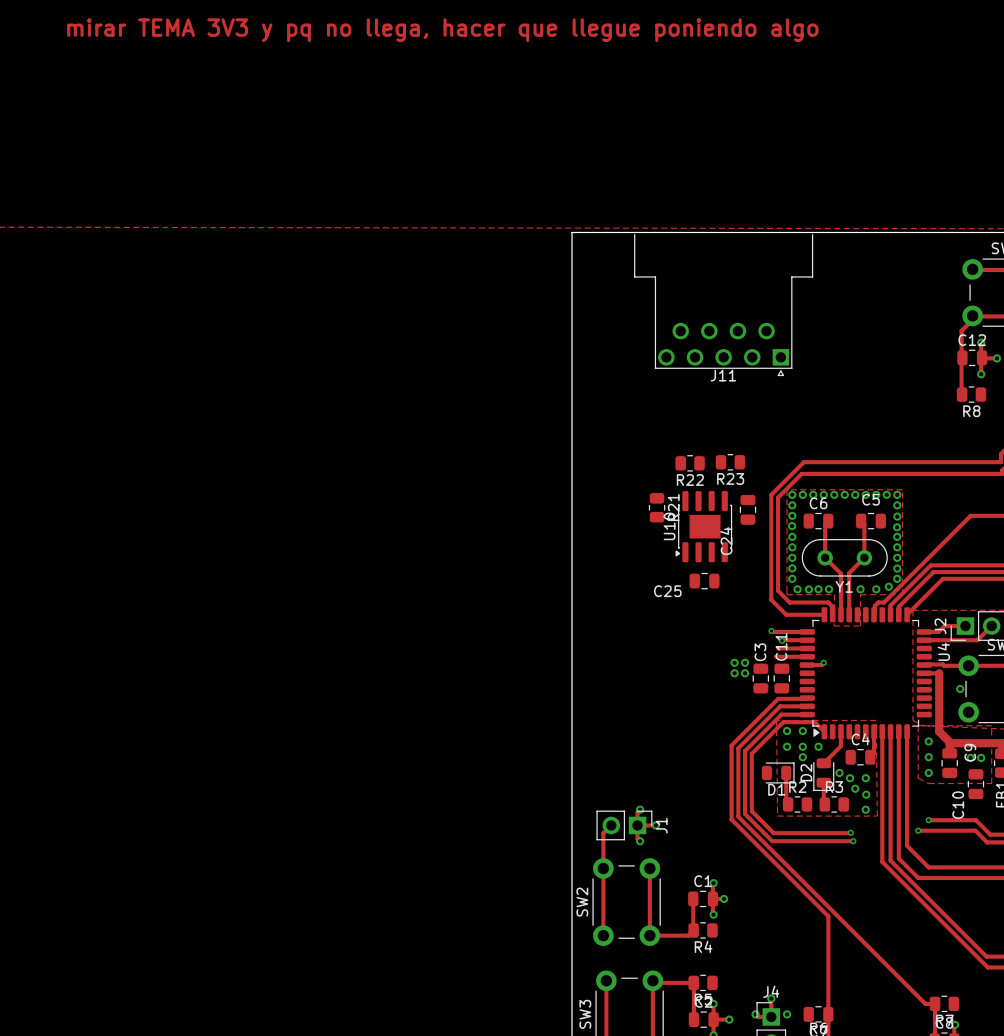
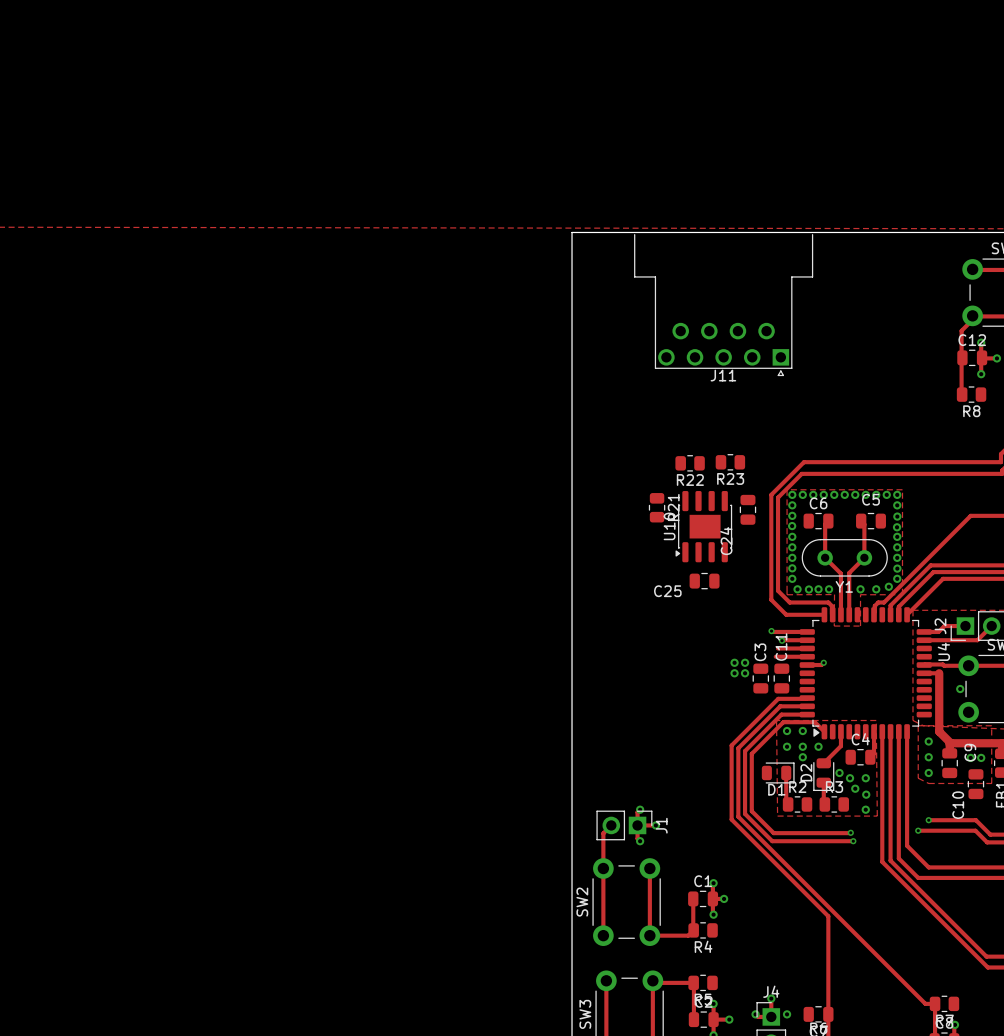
text: mirar TEMA 3V3 y pq no llega, hacer que llegue poniendo algo (442, 30) -> none

